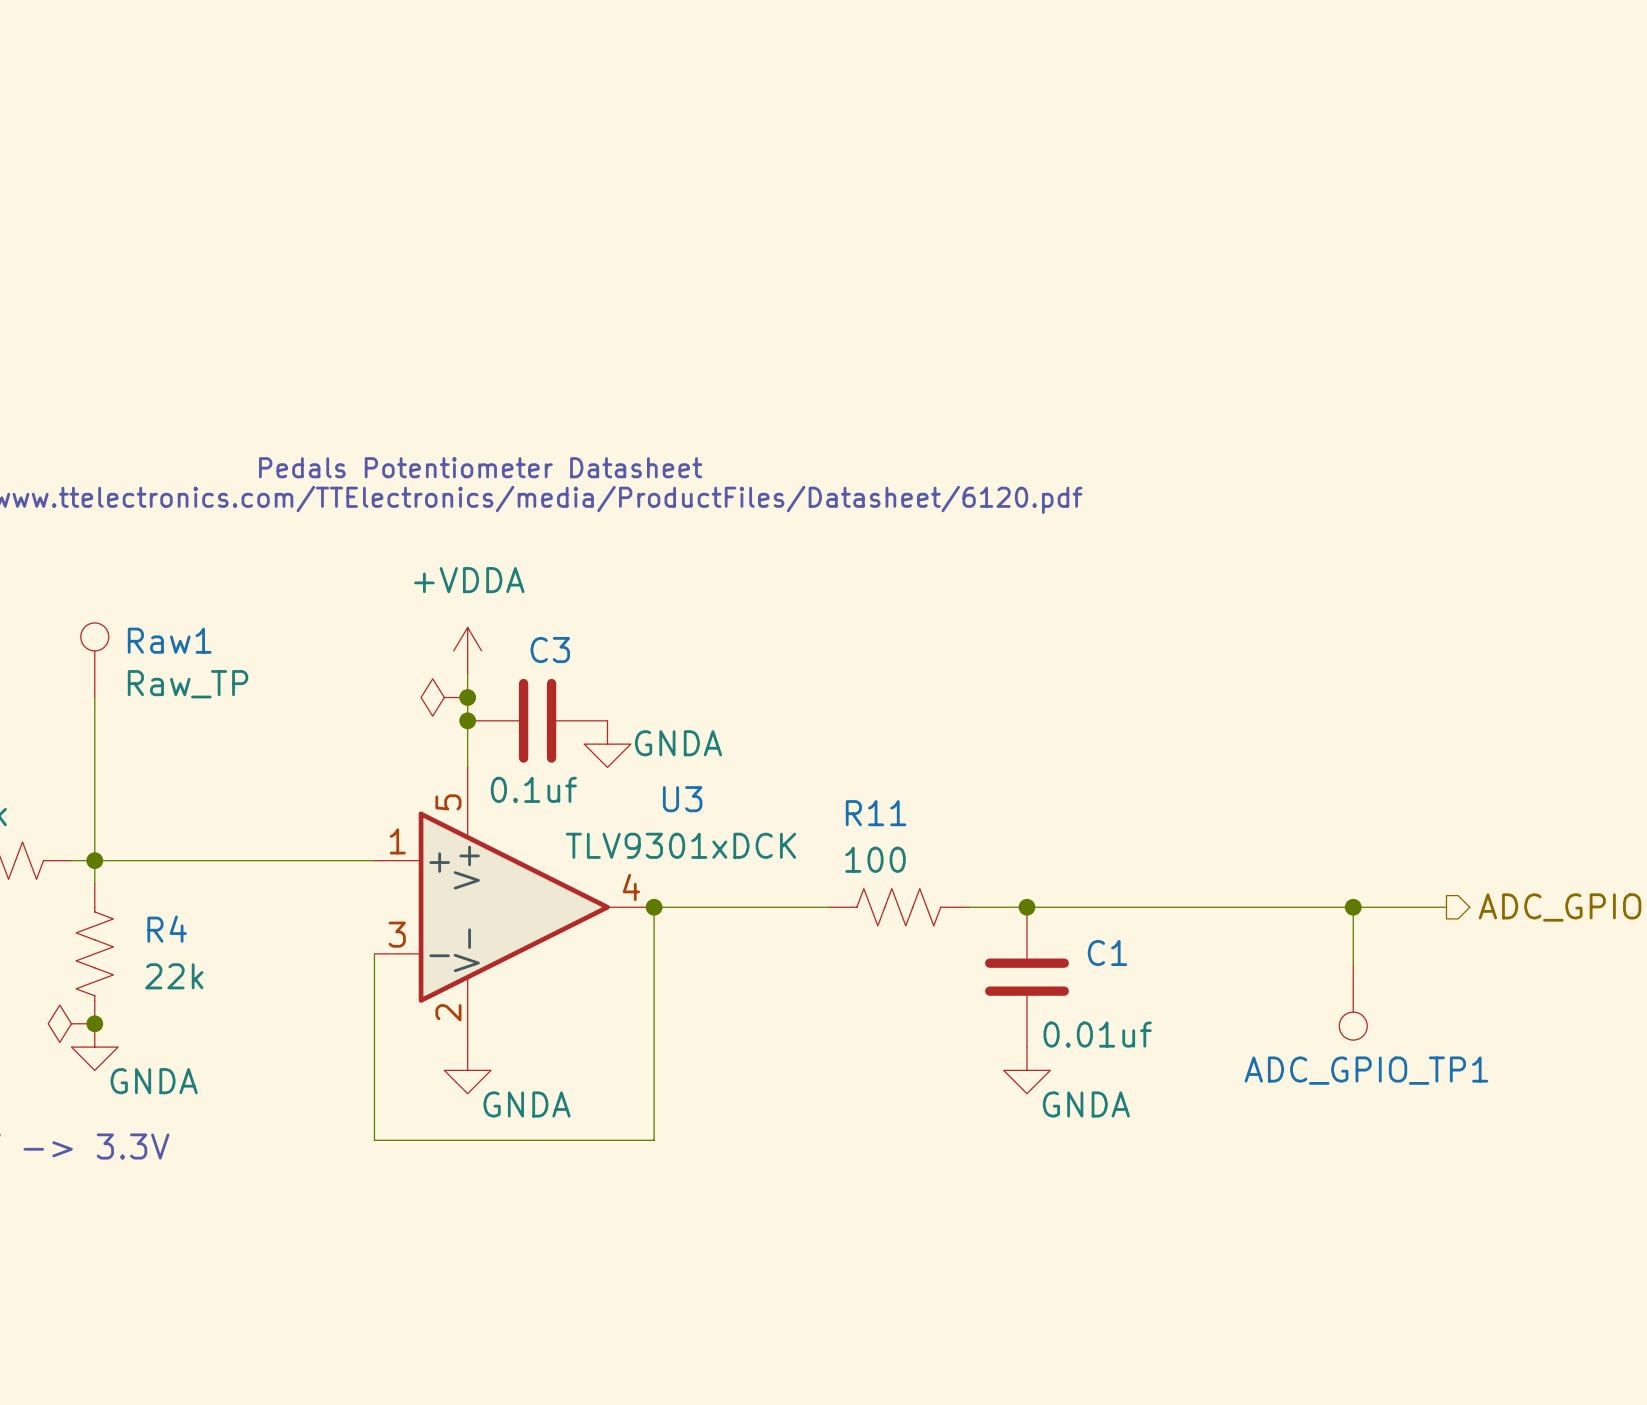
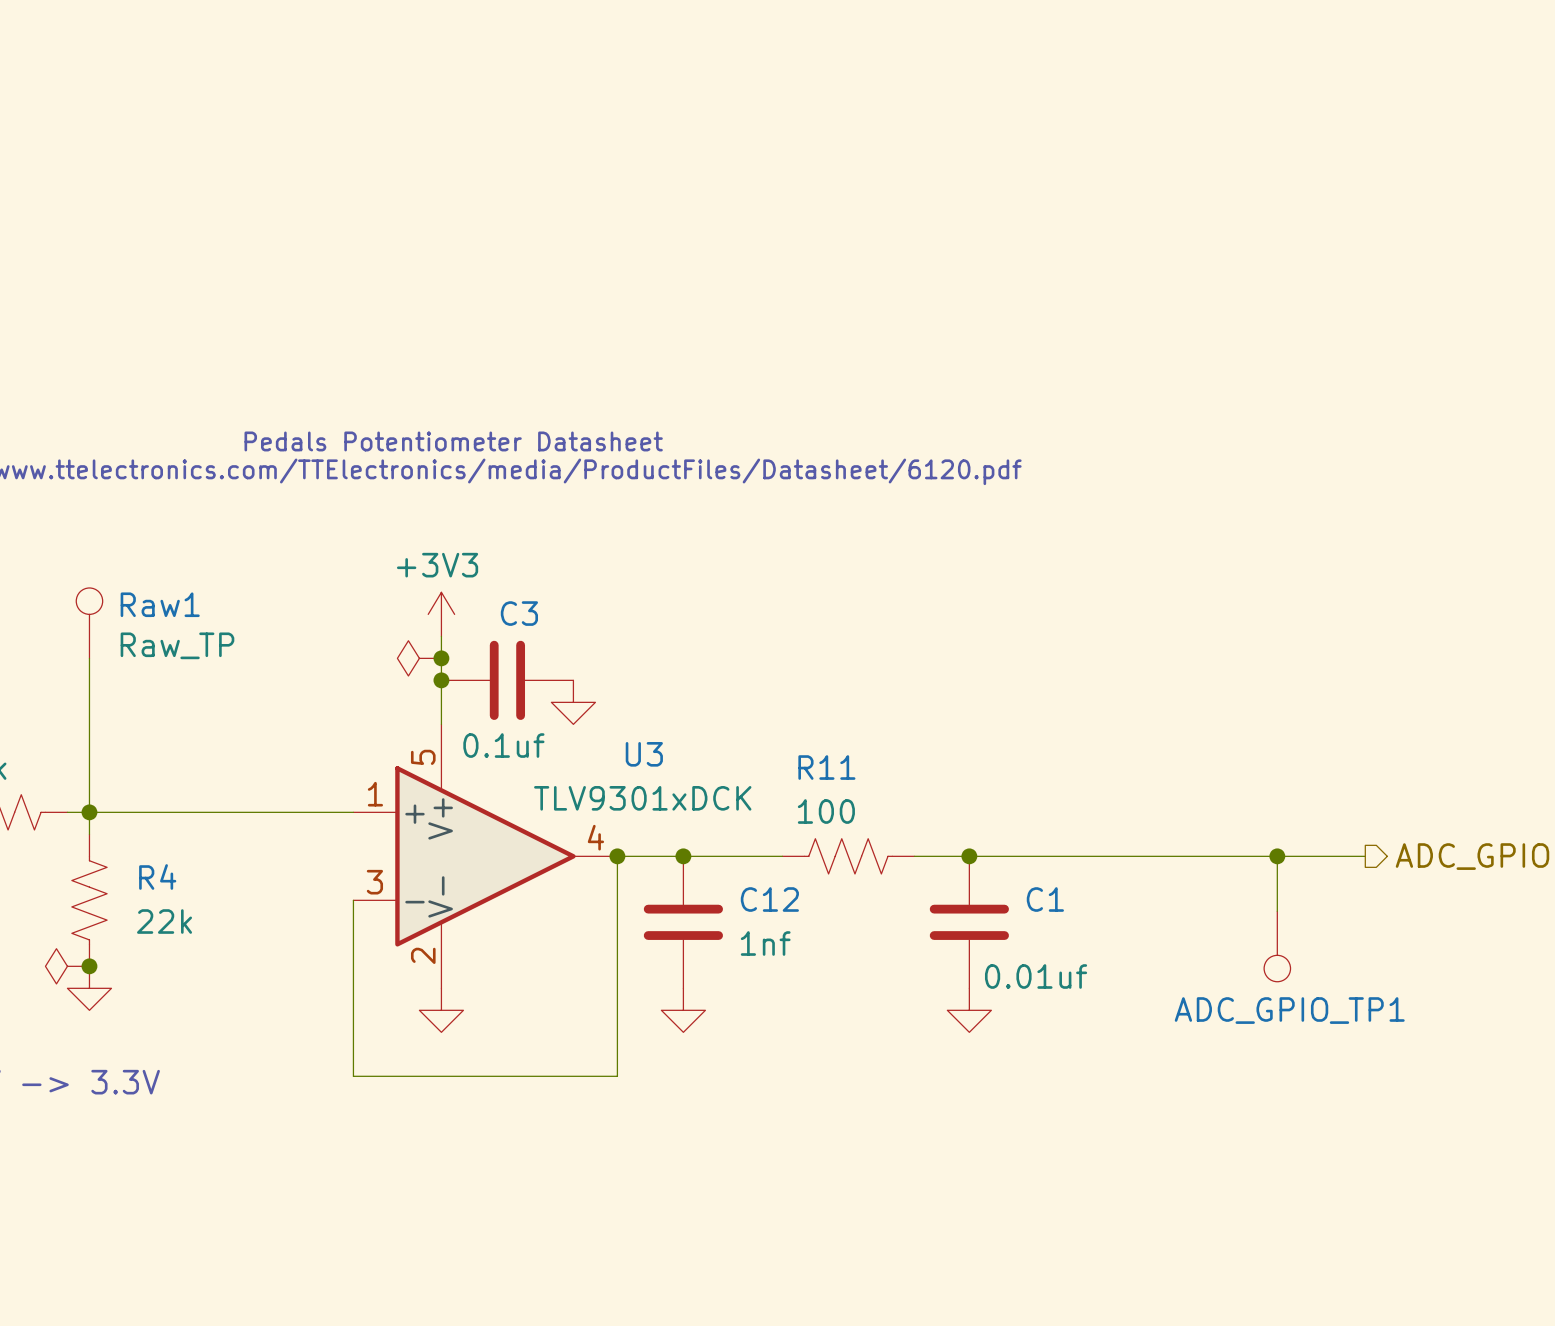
power symbol: +VDDA (467, 650) -> +3V3 (441, 614)
power symbol text: GNDA (678, 743) -> none
junction: none -> (683, 856)
C12: none -> 1nf (683, 922)
power symbol: none -> (683, 1010)
power symbol text: GNDA (154, 1081) -> none
power symbol text: GNDA (527, 1104) -> none
power symbol text: GNDA (1086, 1104) -> none

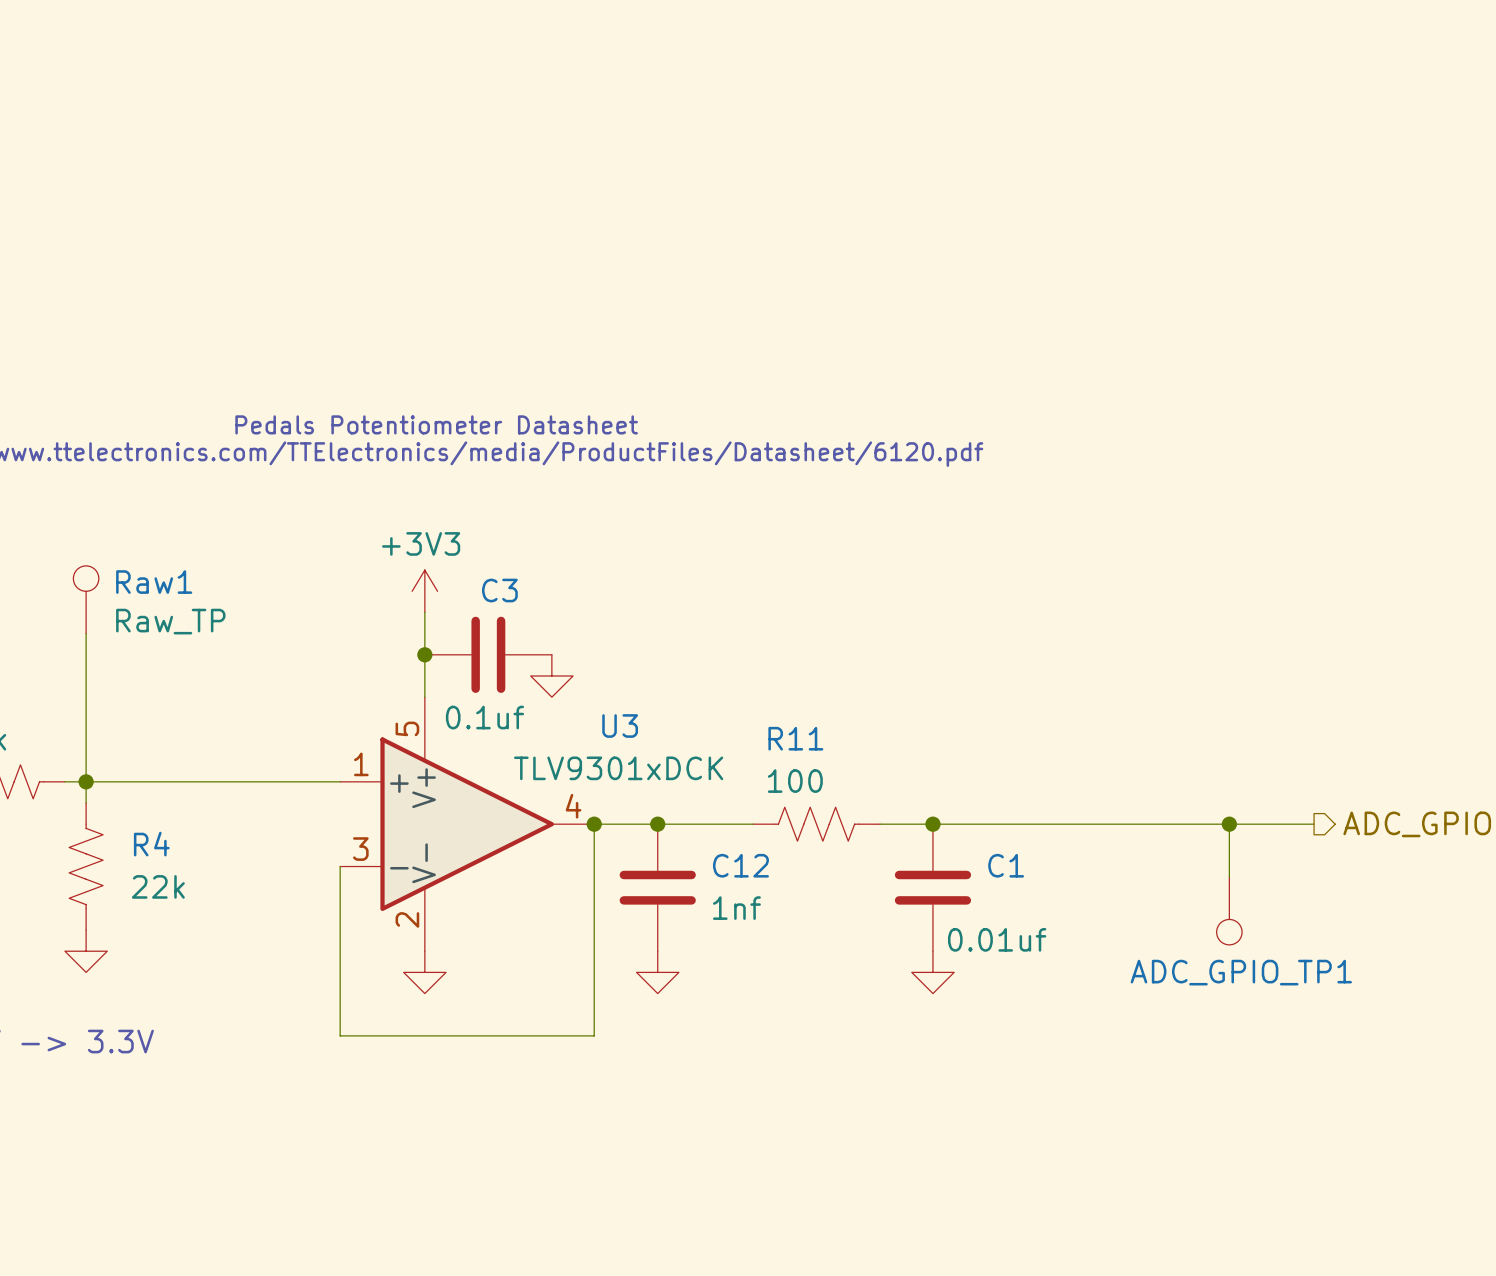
power symbol: (419, 658) -> none
junction: (441, 658) -> none
power symbol: (67, 966) -> none
junction: (89, 966) -> none

